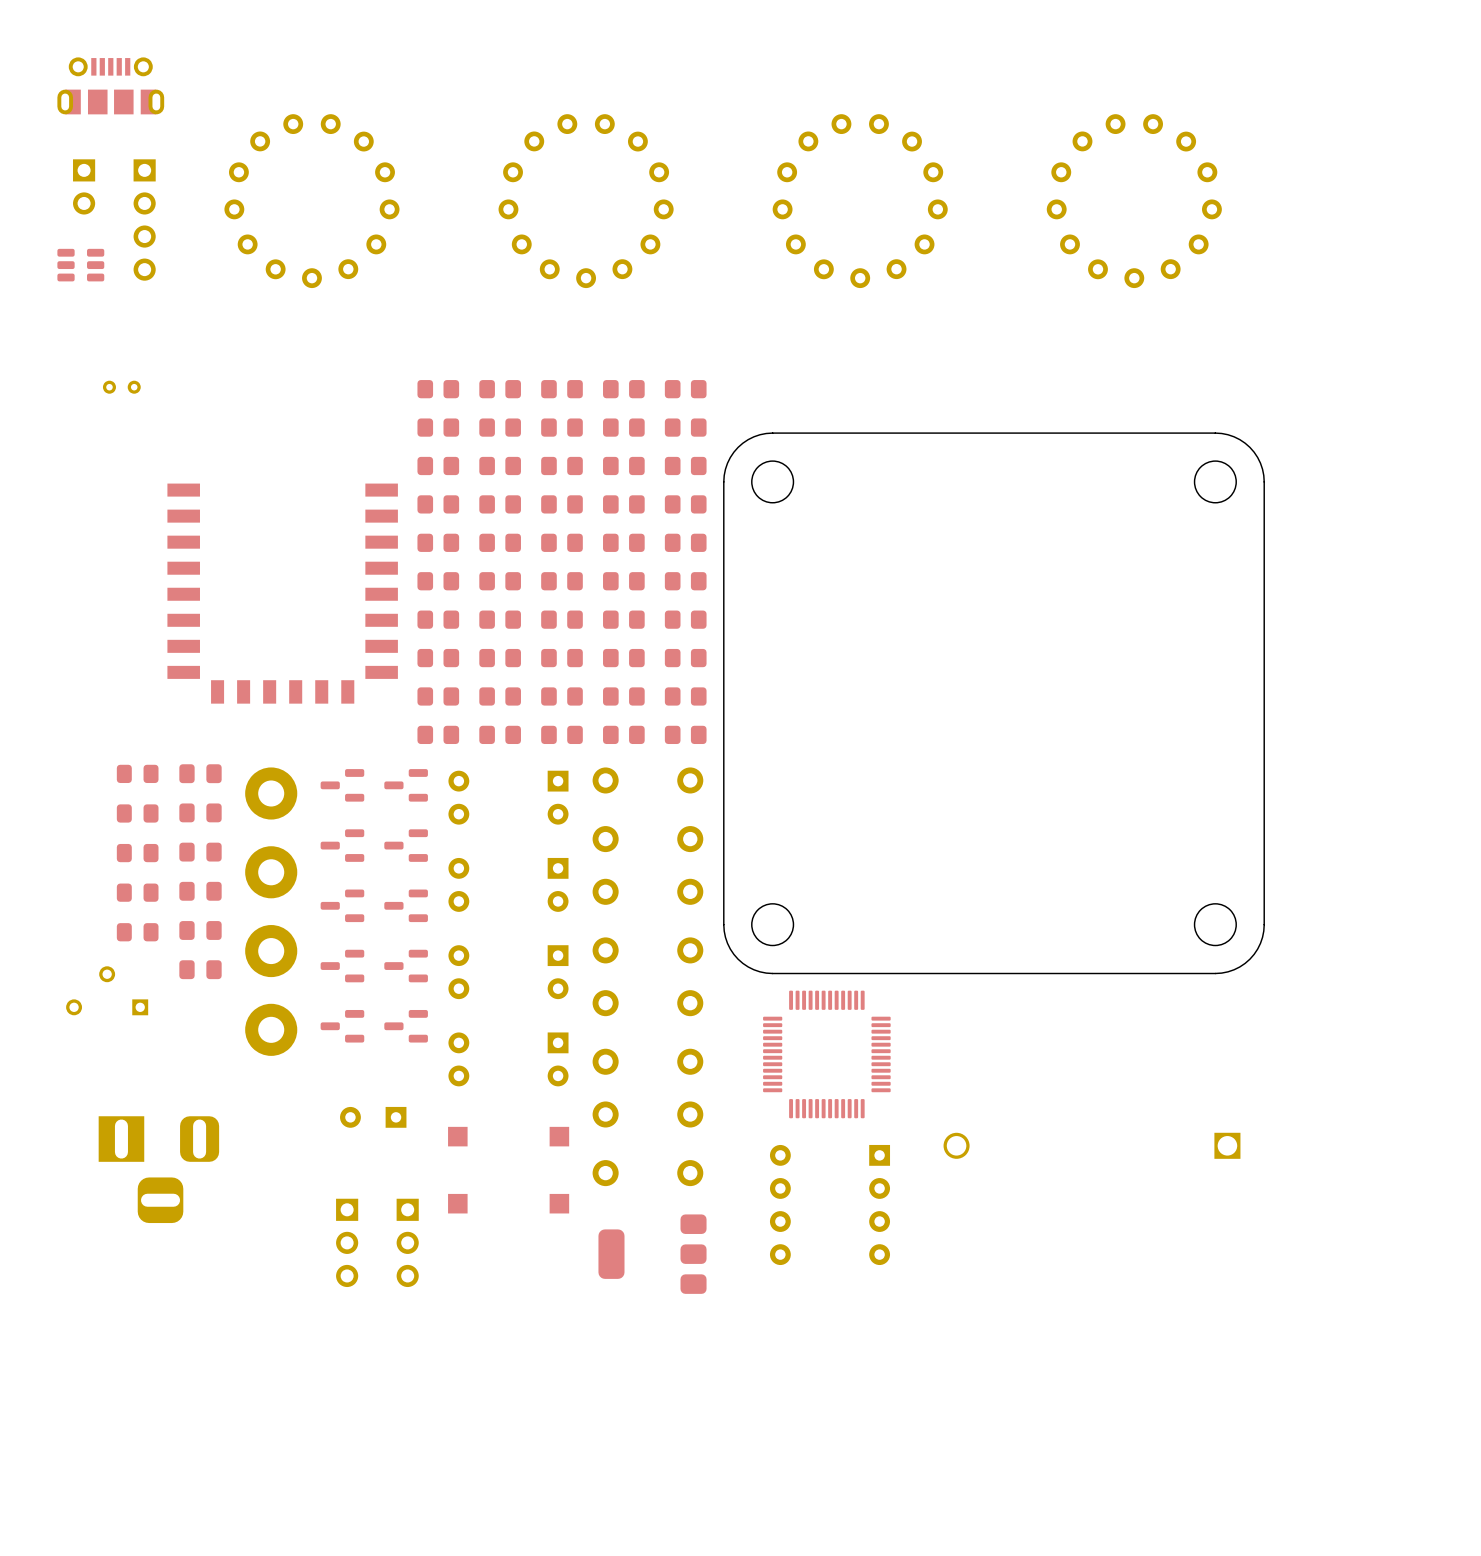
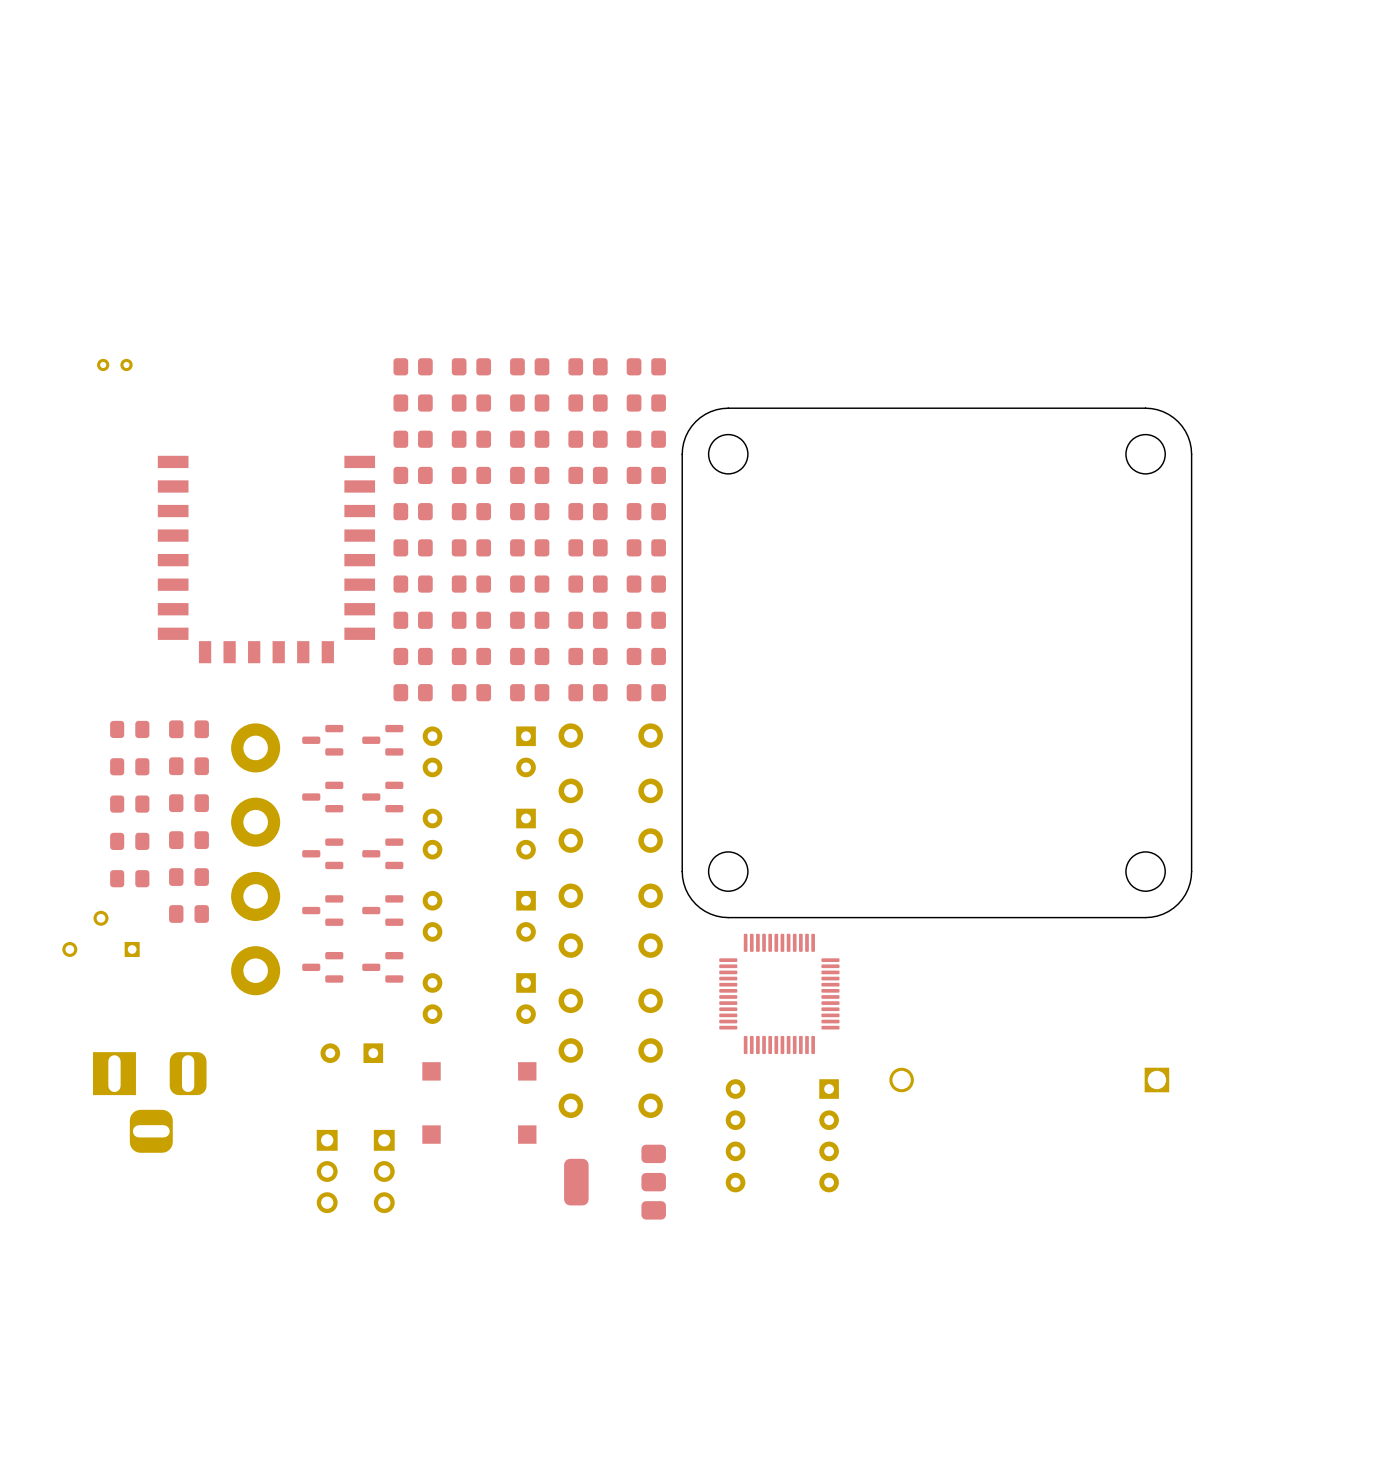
part: (110, 85) -> none
part: (84, 186) -> none
part: (311, 201) -> none
part: (586, 201) -> none
part: (860, 201) -> none
part: (1134, 201) -> none
part: (144, 220) -> none
part: (80, 265) -> none

